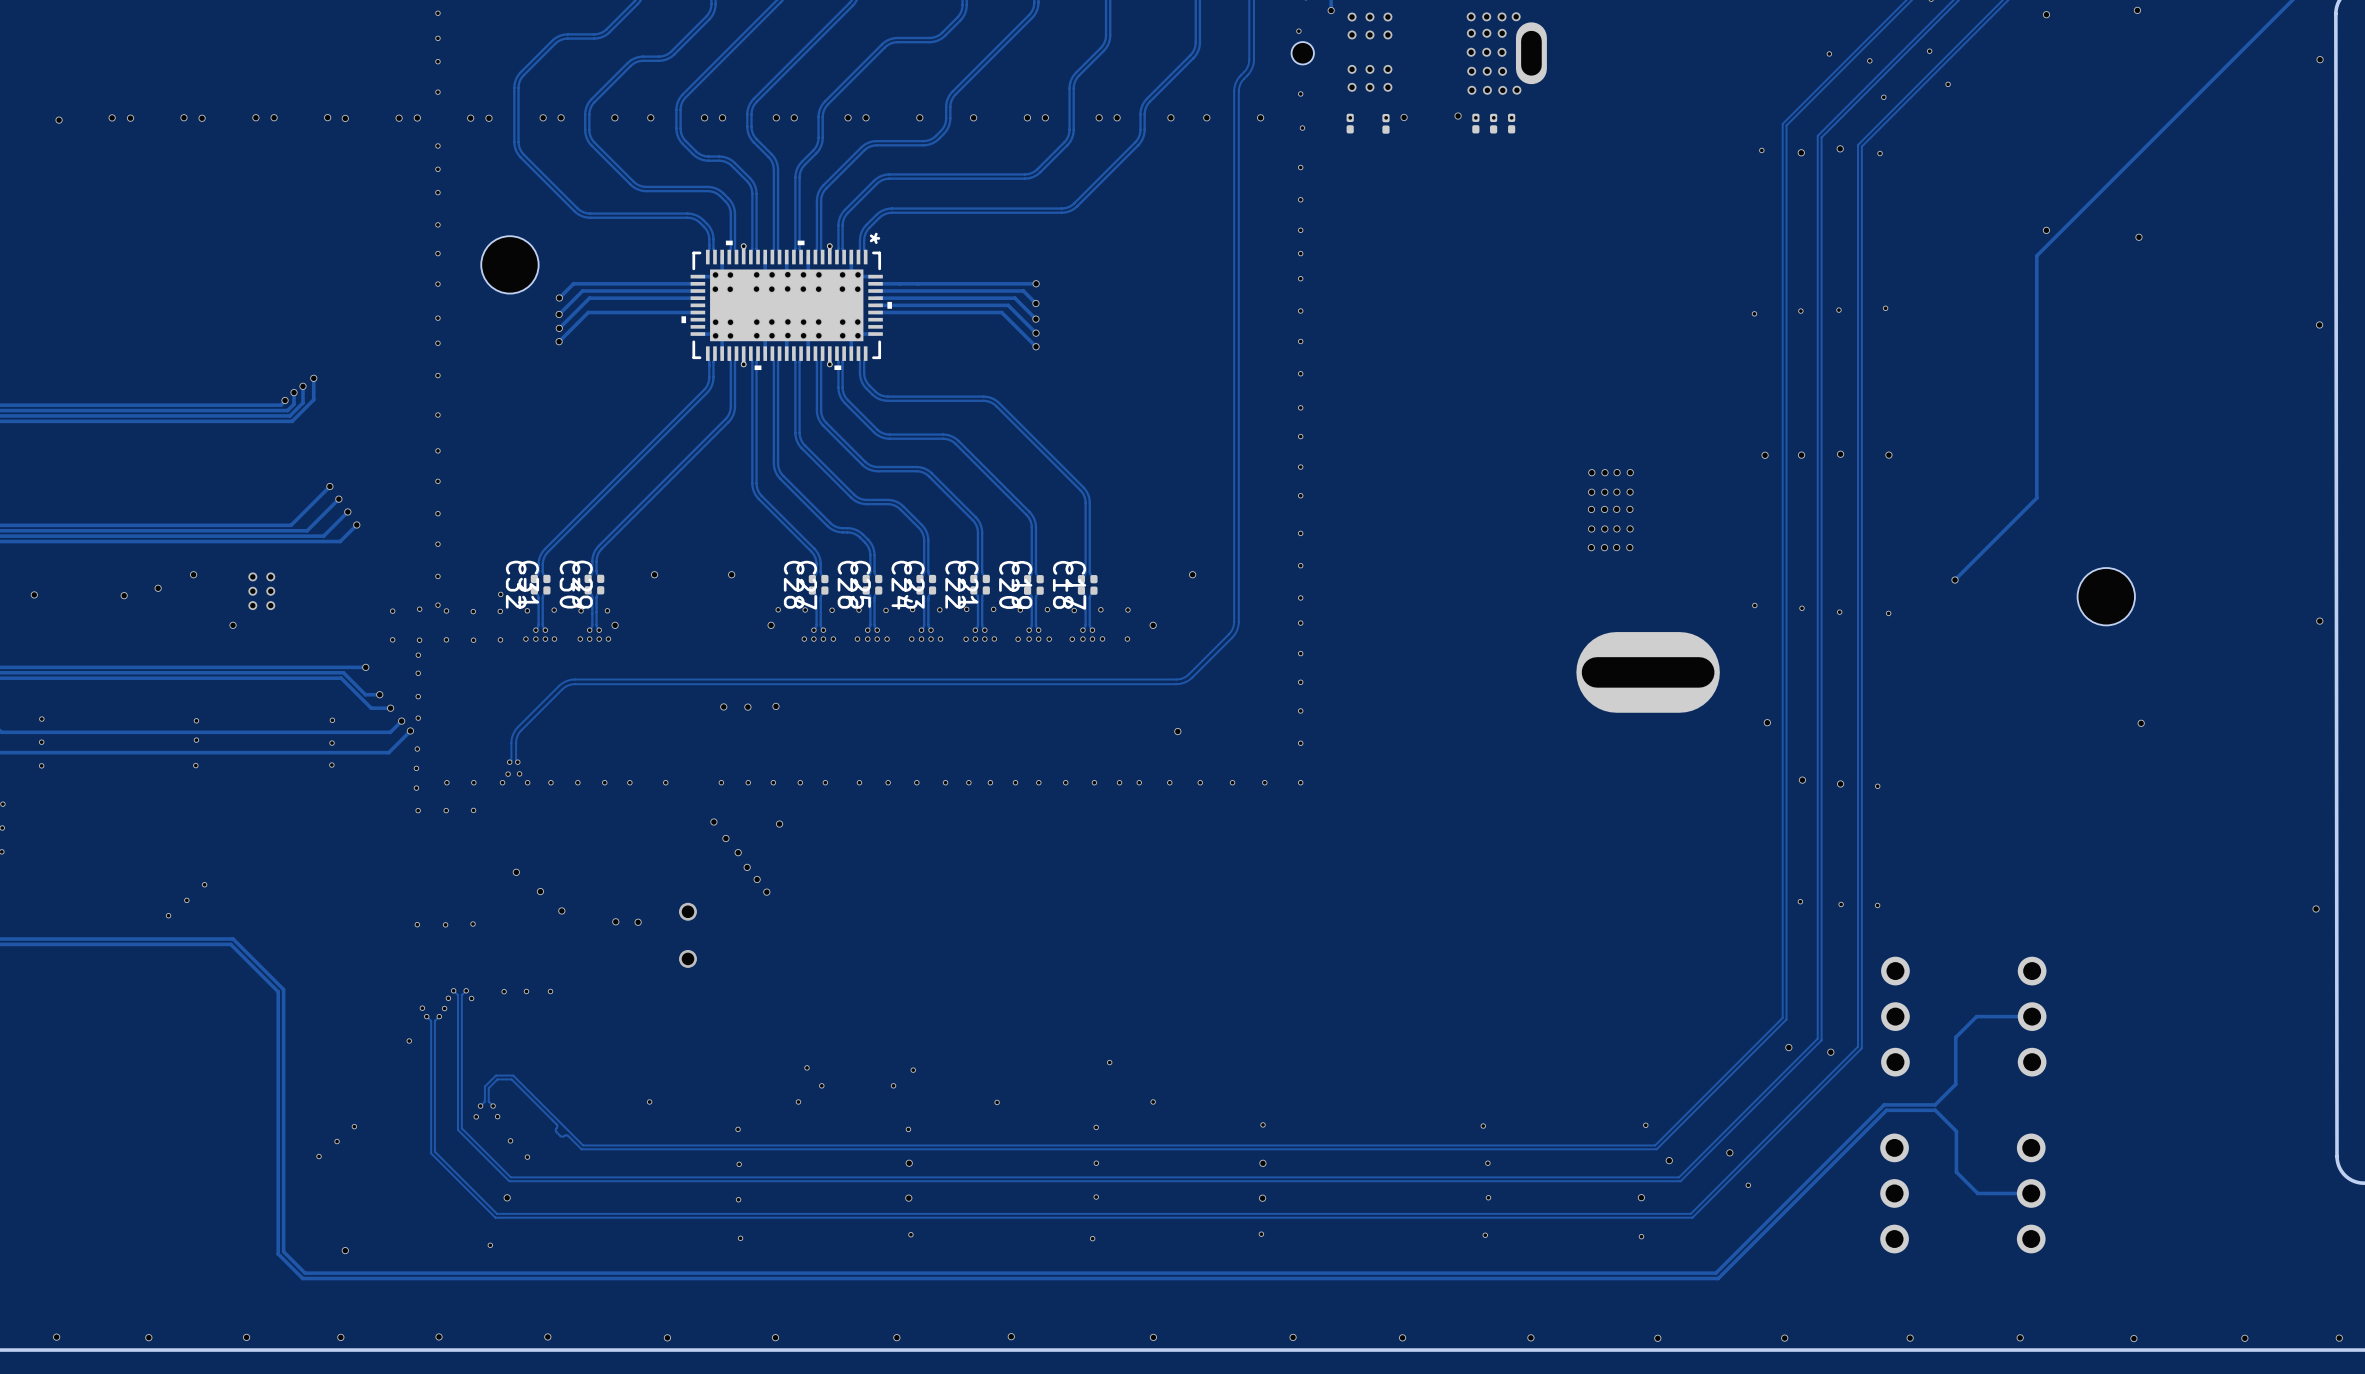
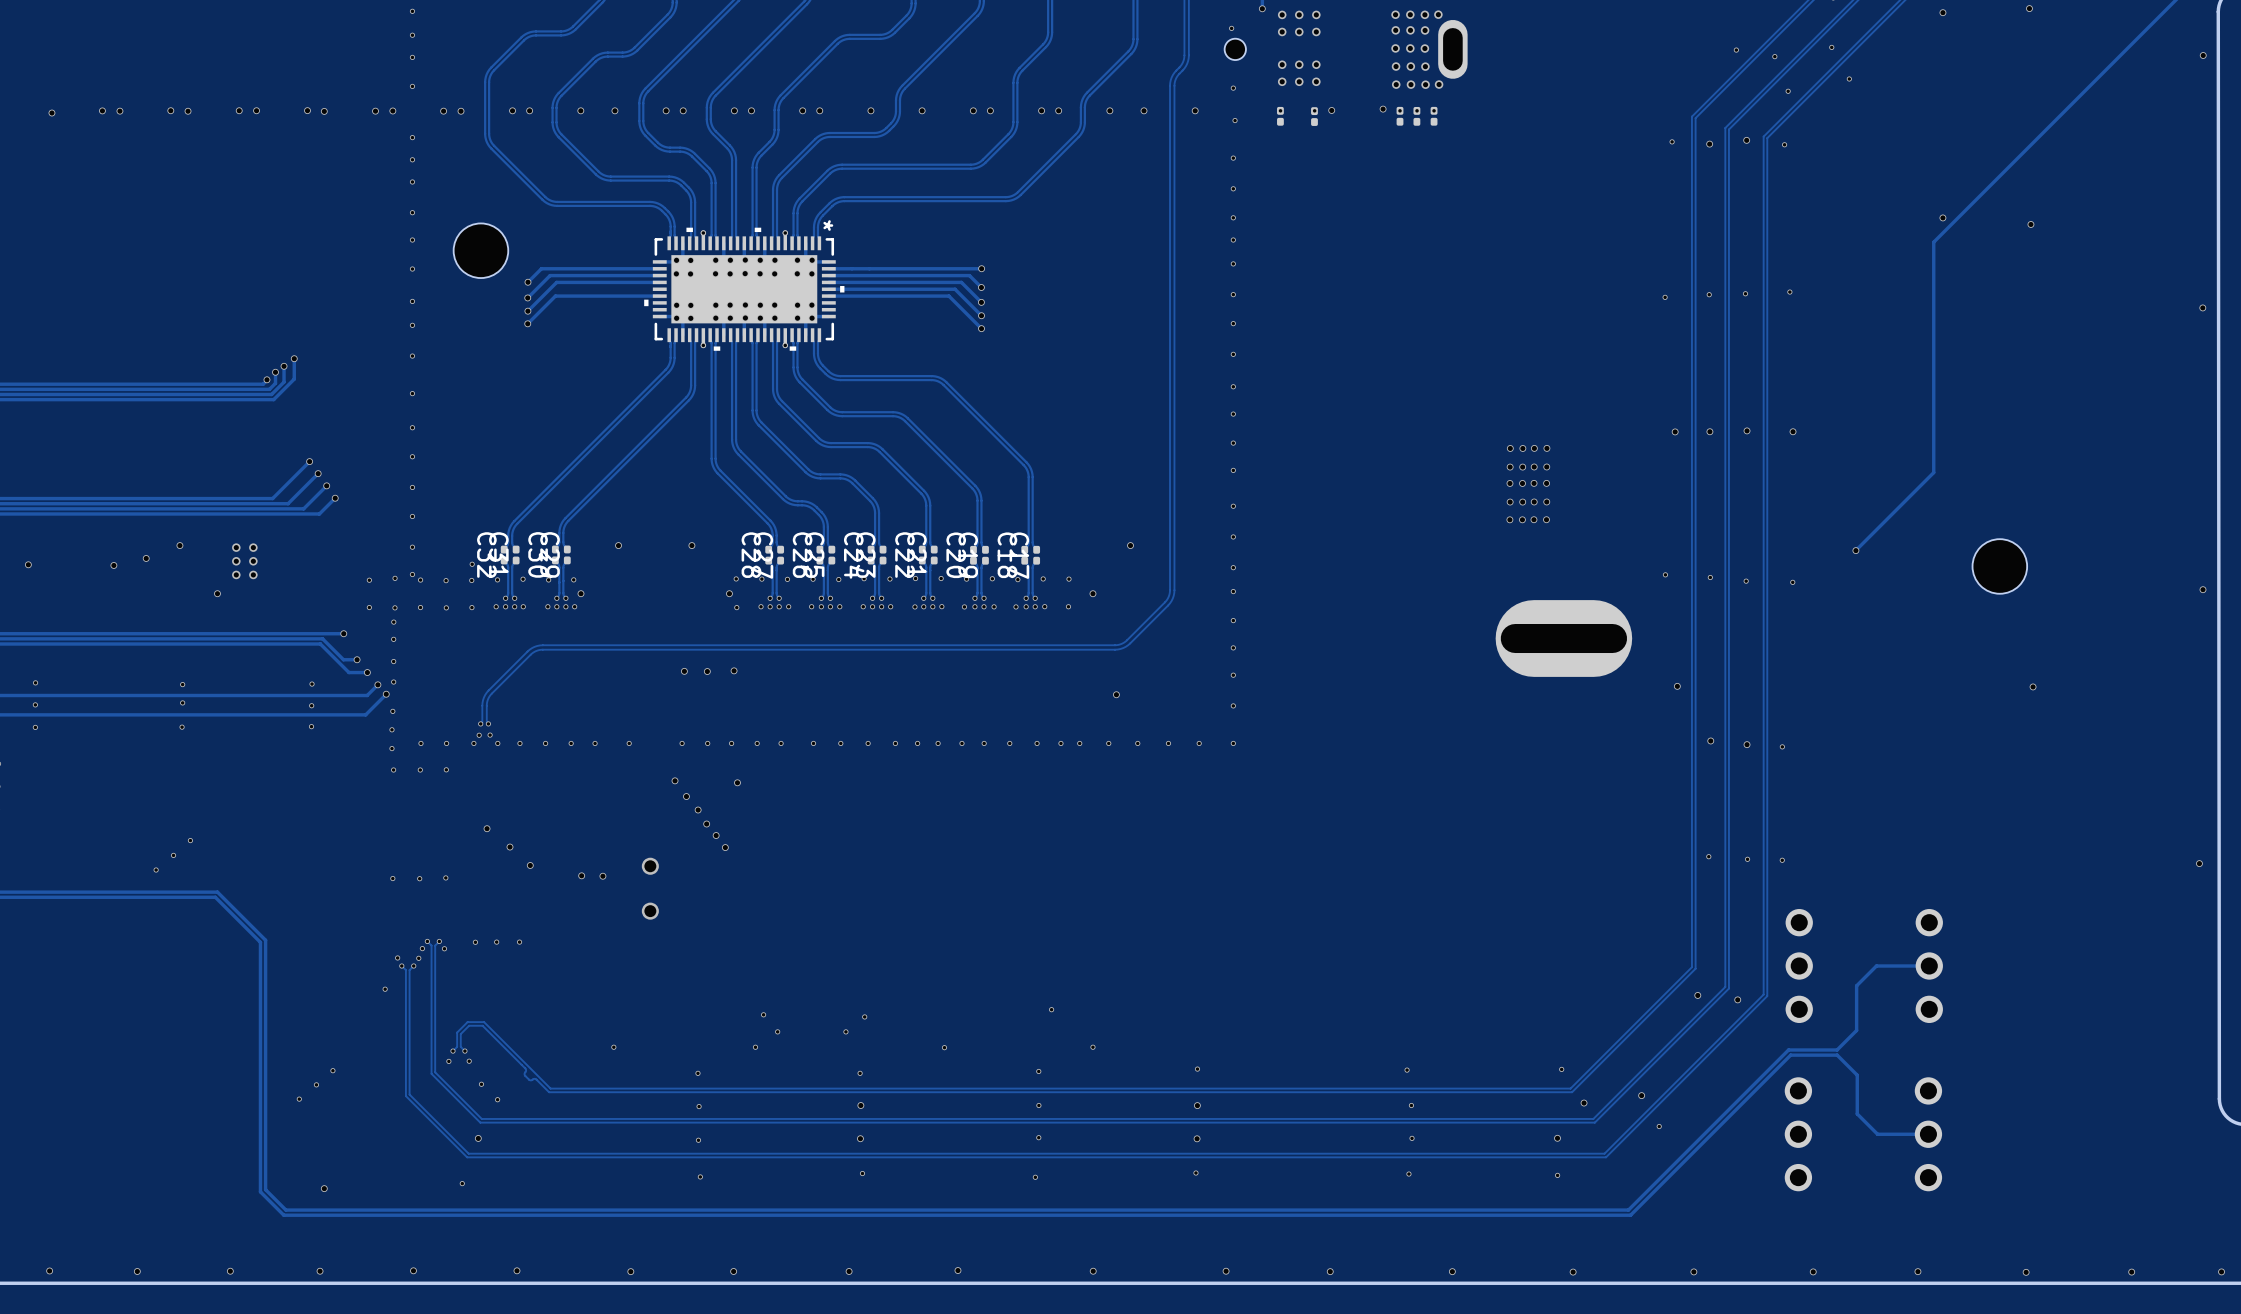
via: none -> (736, 607)

